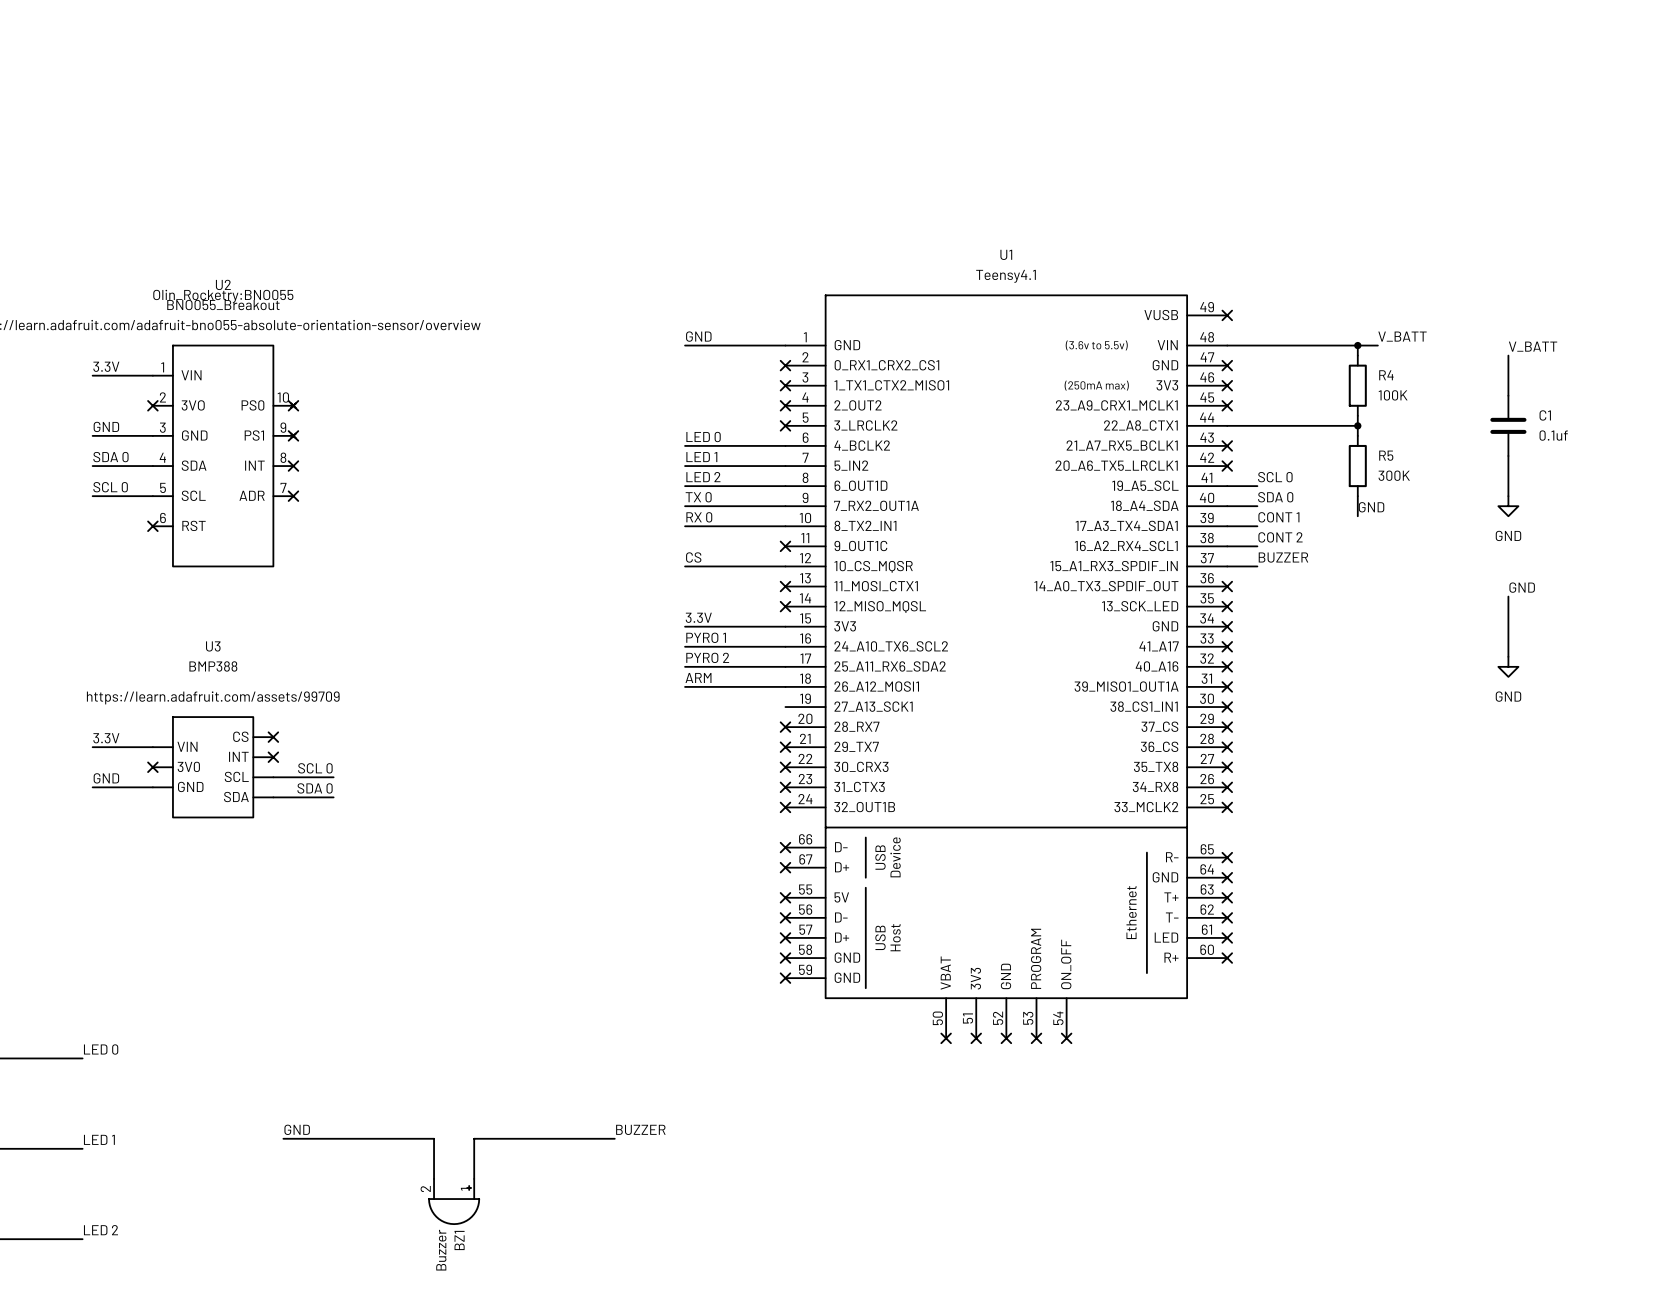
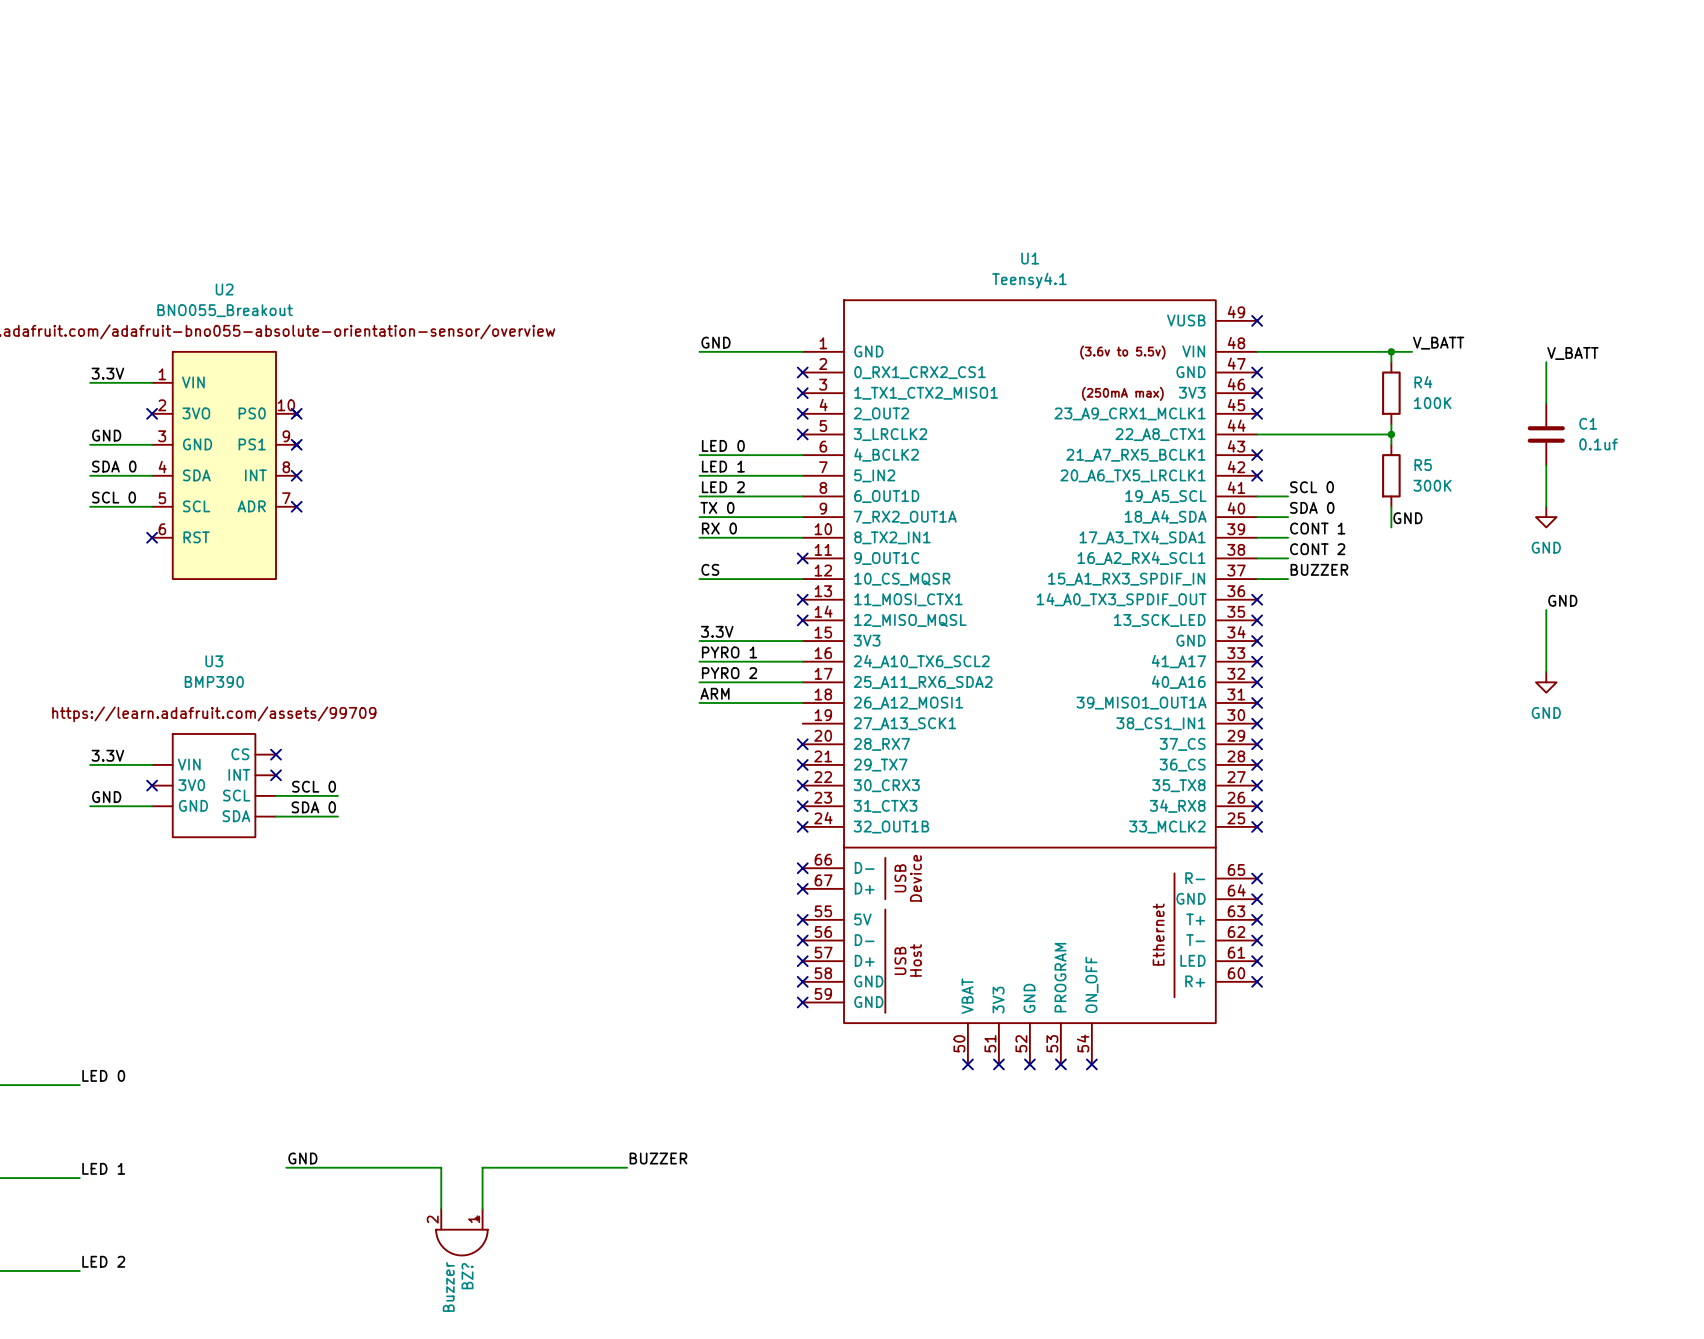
U2 text: Olin_Rocketry:BNO055 (223, 296) -> none
U3 value: BMP388 (213, 666) -> BMP390 (214, 681)
BZ1 name: BZ1 (459, 1240) -> BZ? (467, 1276)

